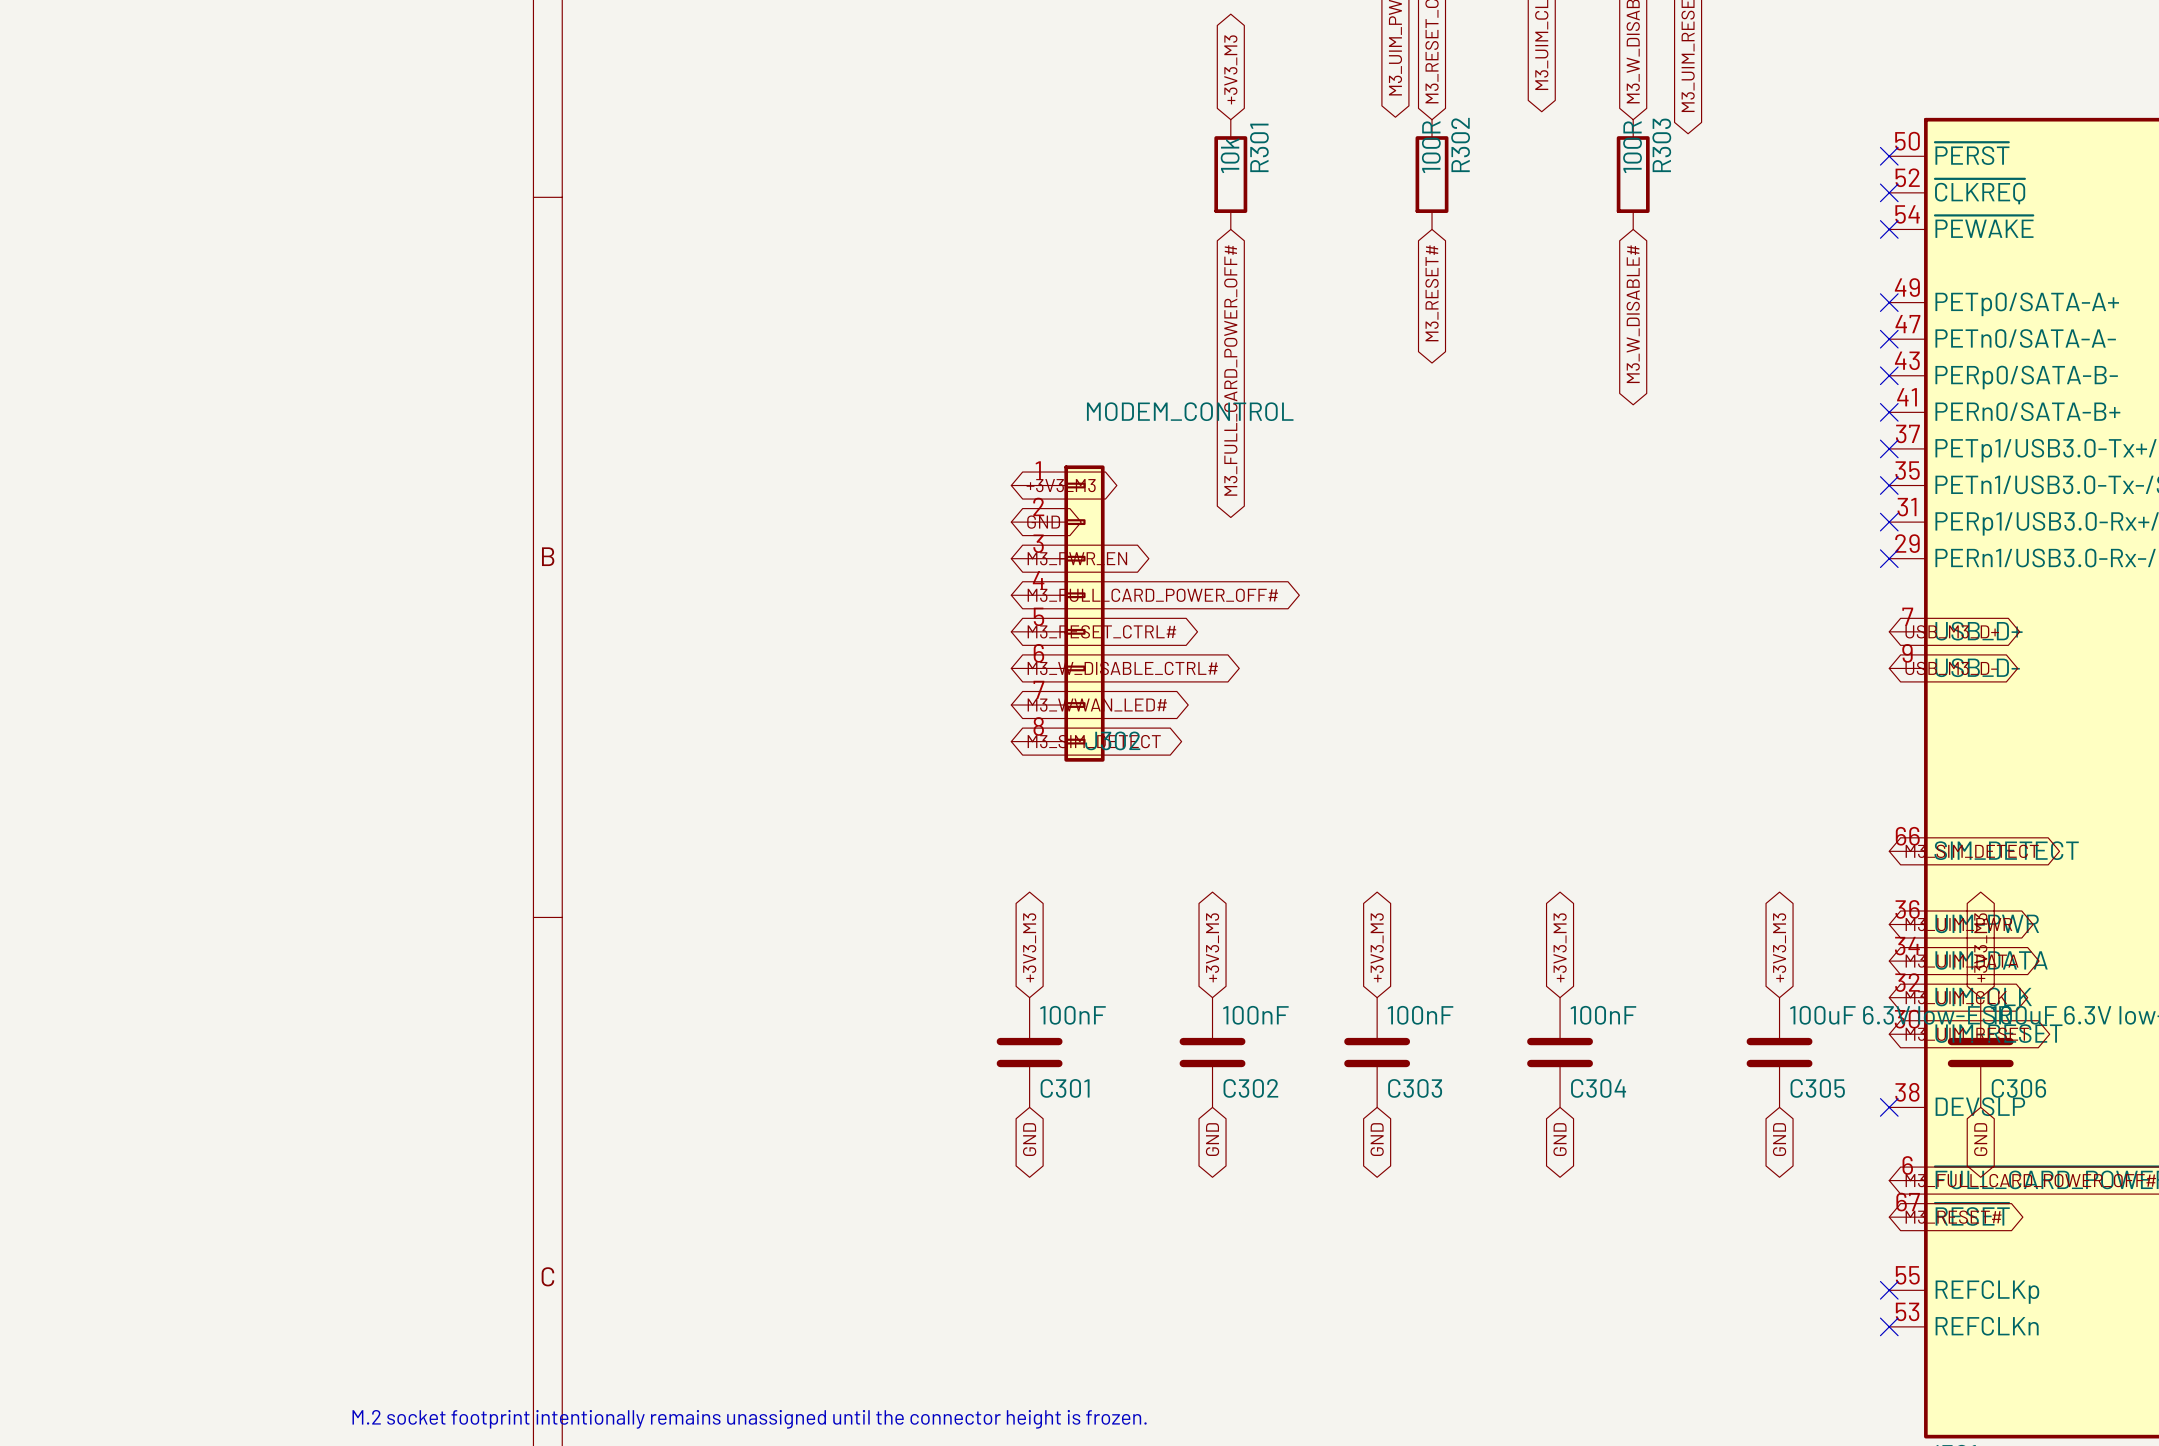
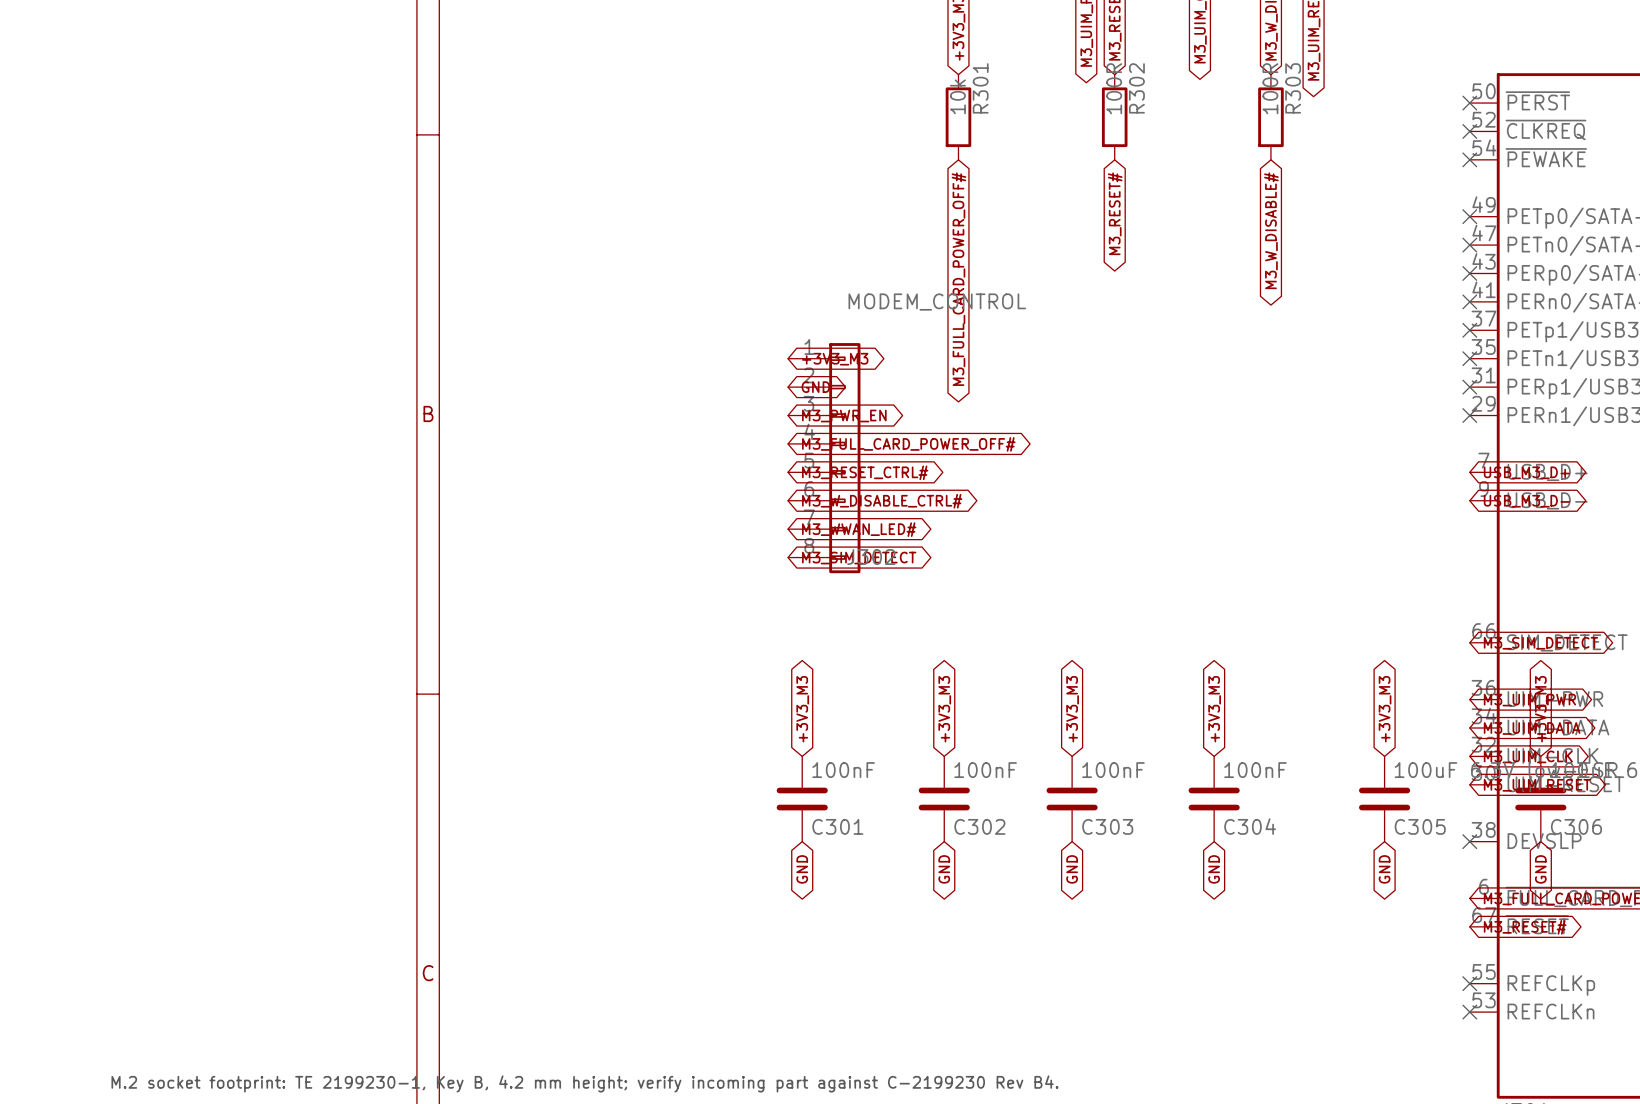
text: M.2 socket footprint intentionally remains unassigned until the connector height is frozen. (749, 1419) -> M.2 socket footprint: TE 2199230-1, Key B, 4.2 mm height; verify incoming part against C-2199230 Rev B4. (584, 1083)

